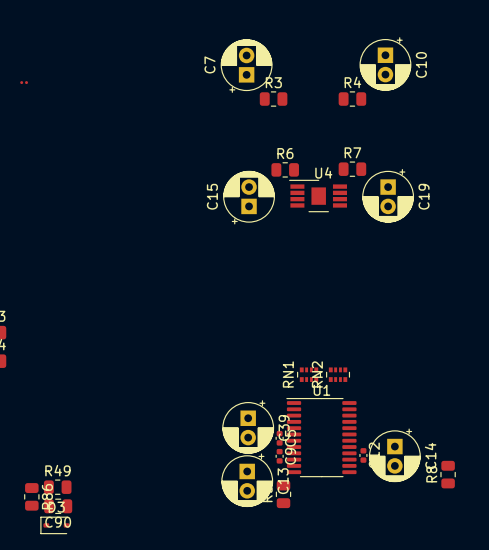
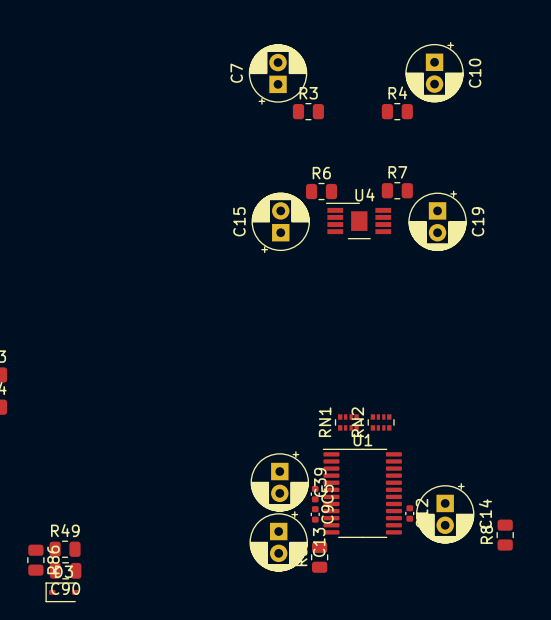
part: (24, 82) -> none

